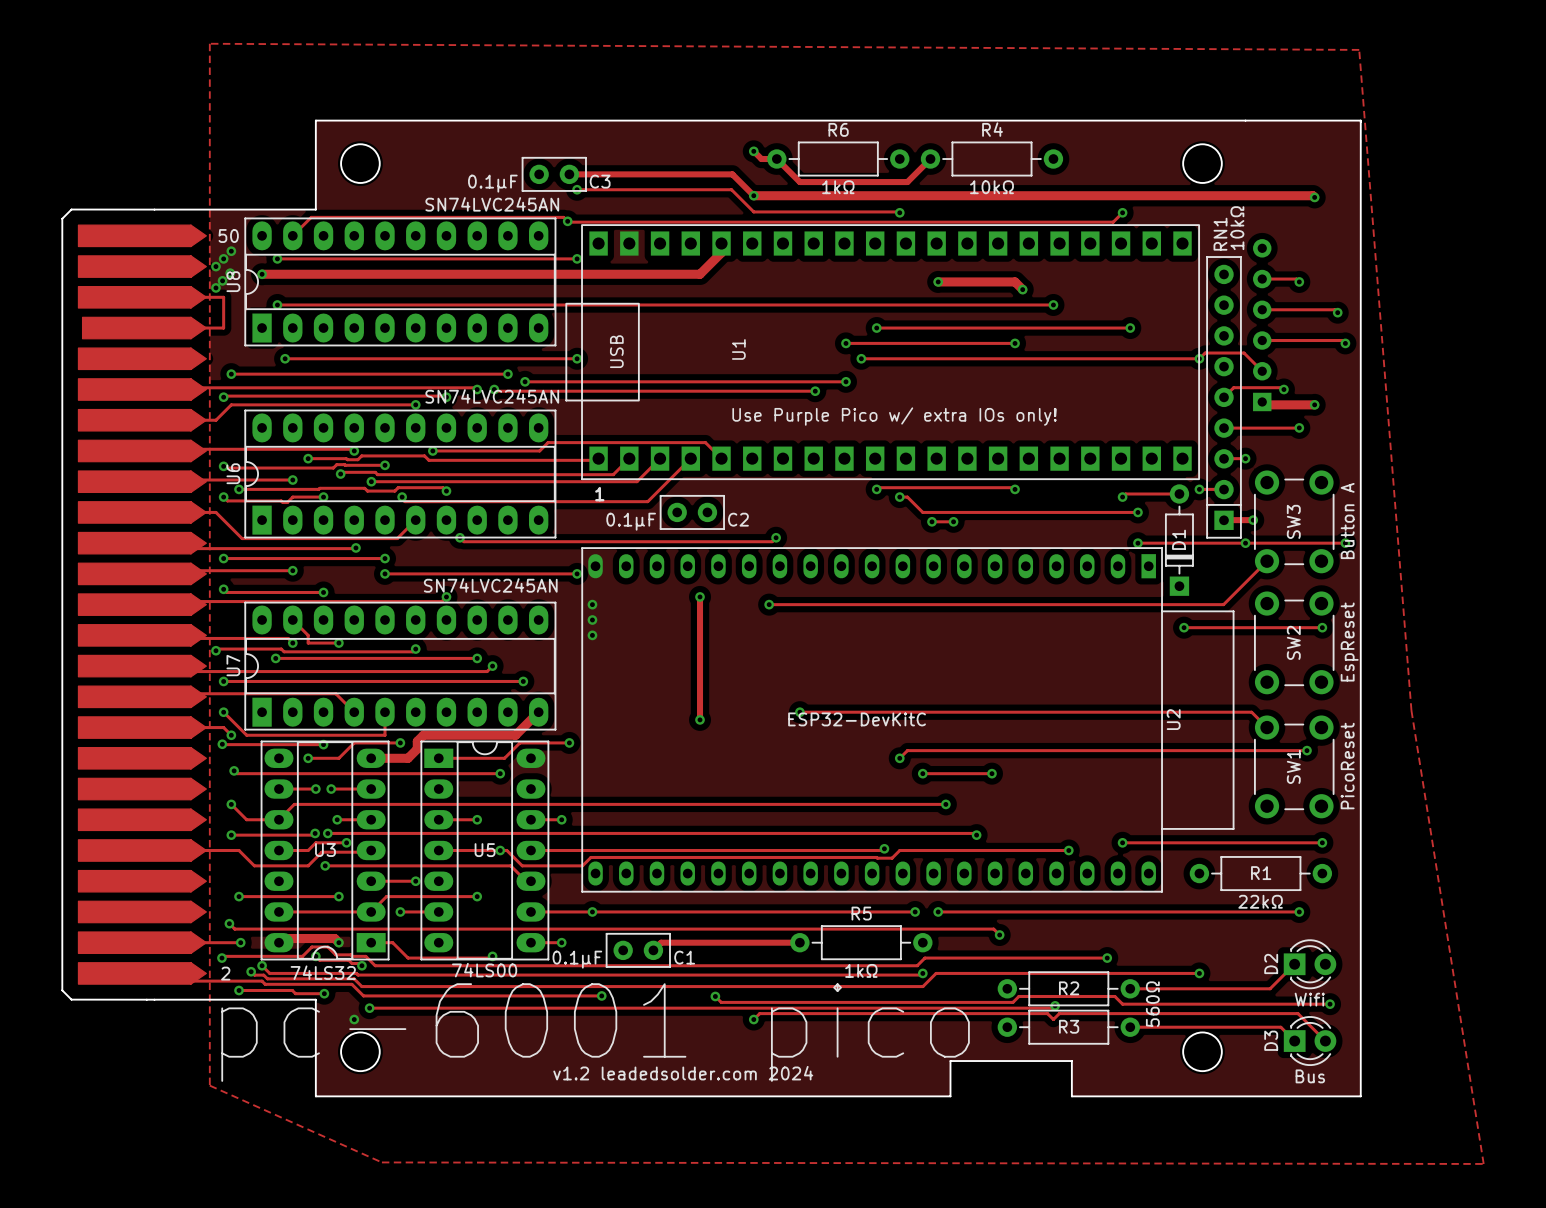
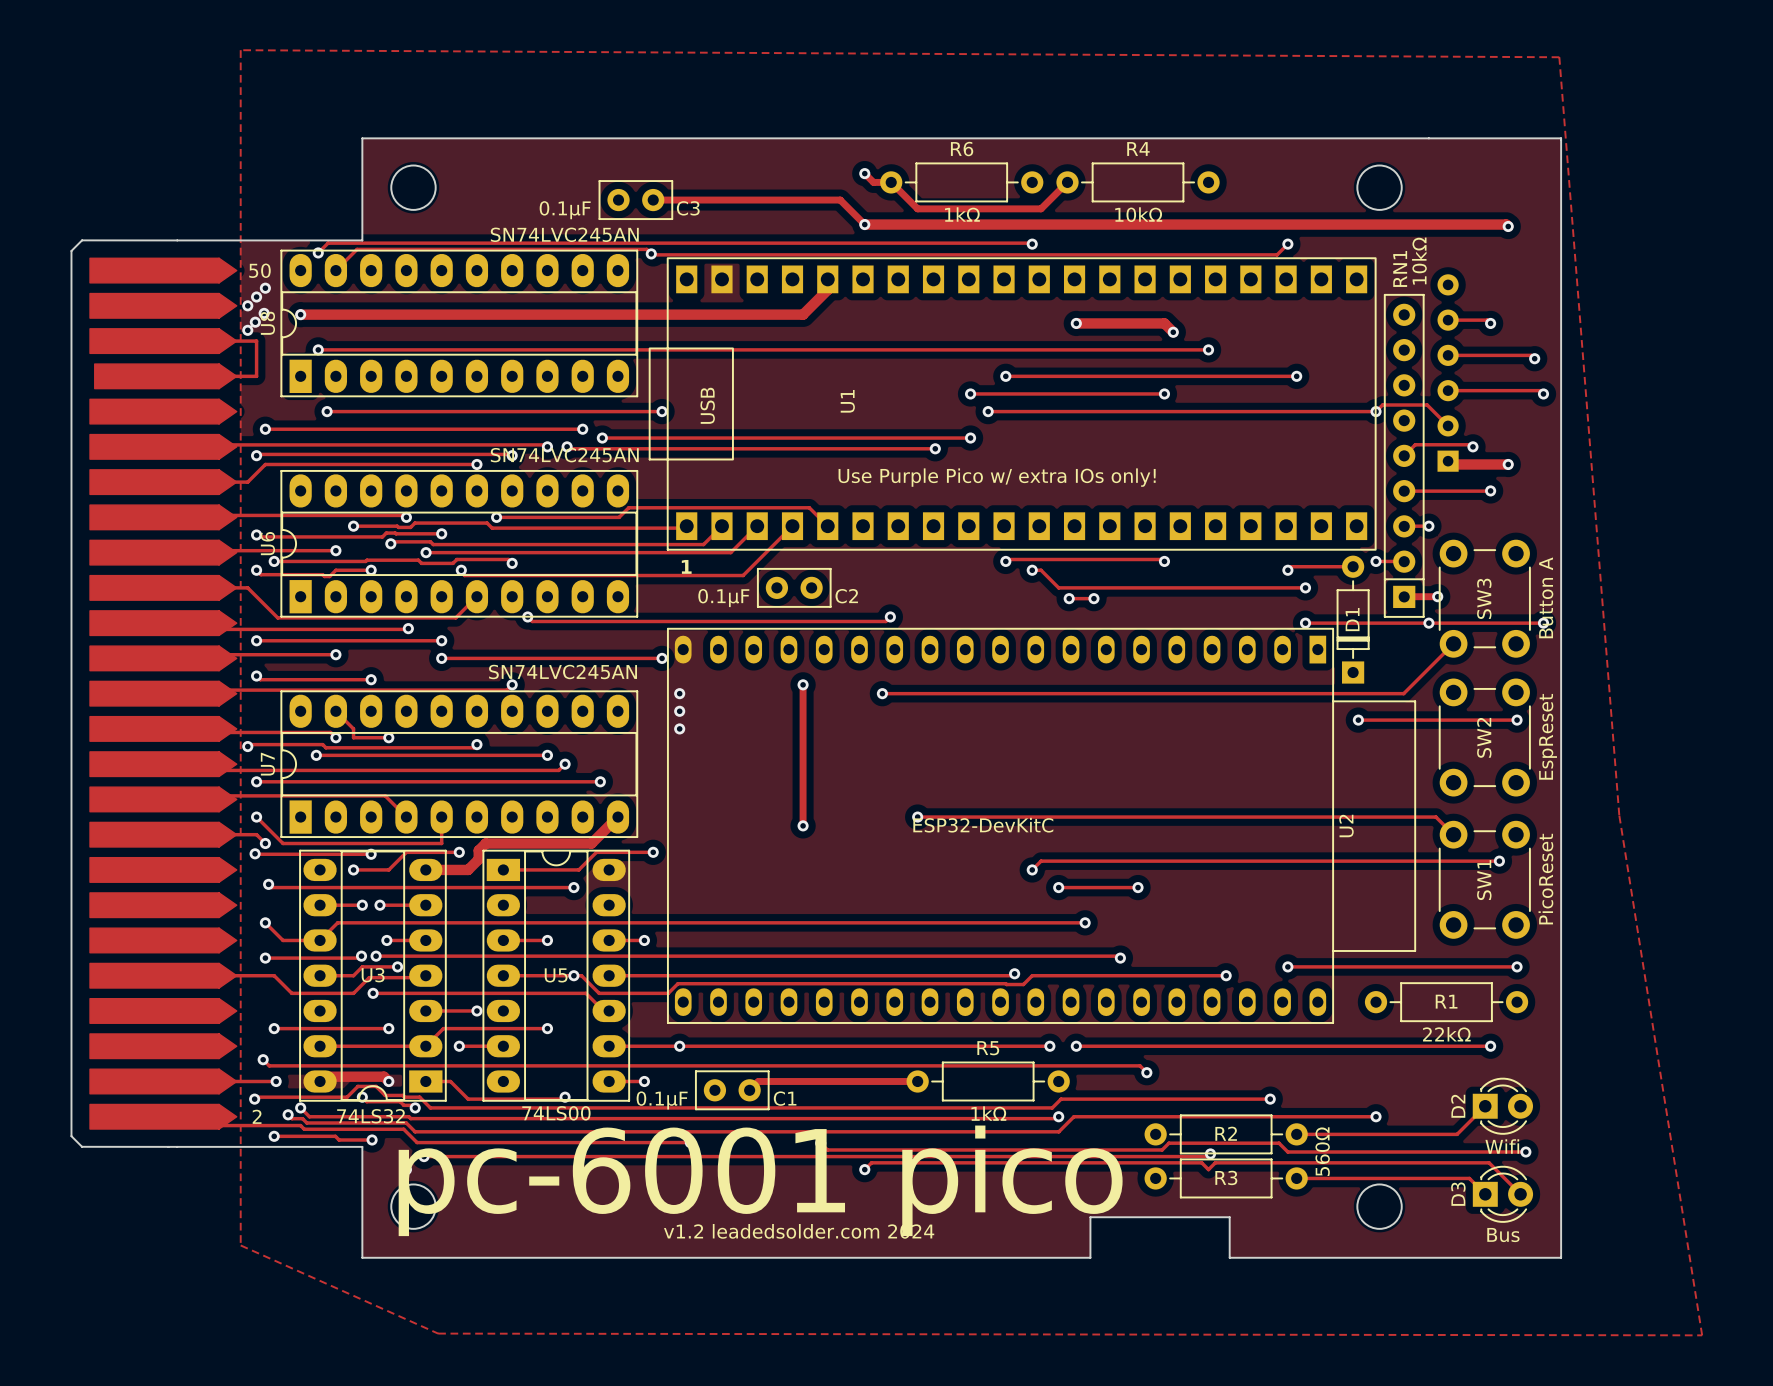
track: (577, 189) (731, 189) (753, 211) -> (318, 252) (328, 243) (864, 243)
via: (577, 189) -> none
track: (277, 258) (577, 258) -> none
via position: (277, 258) -> (318, 252)
via: (577, 258) -> none

